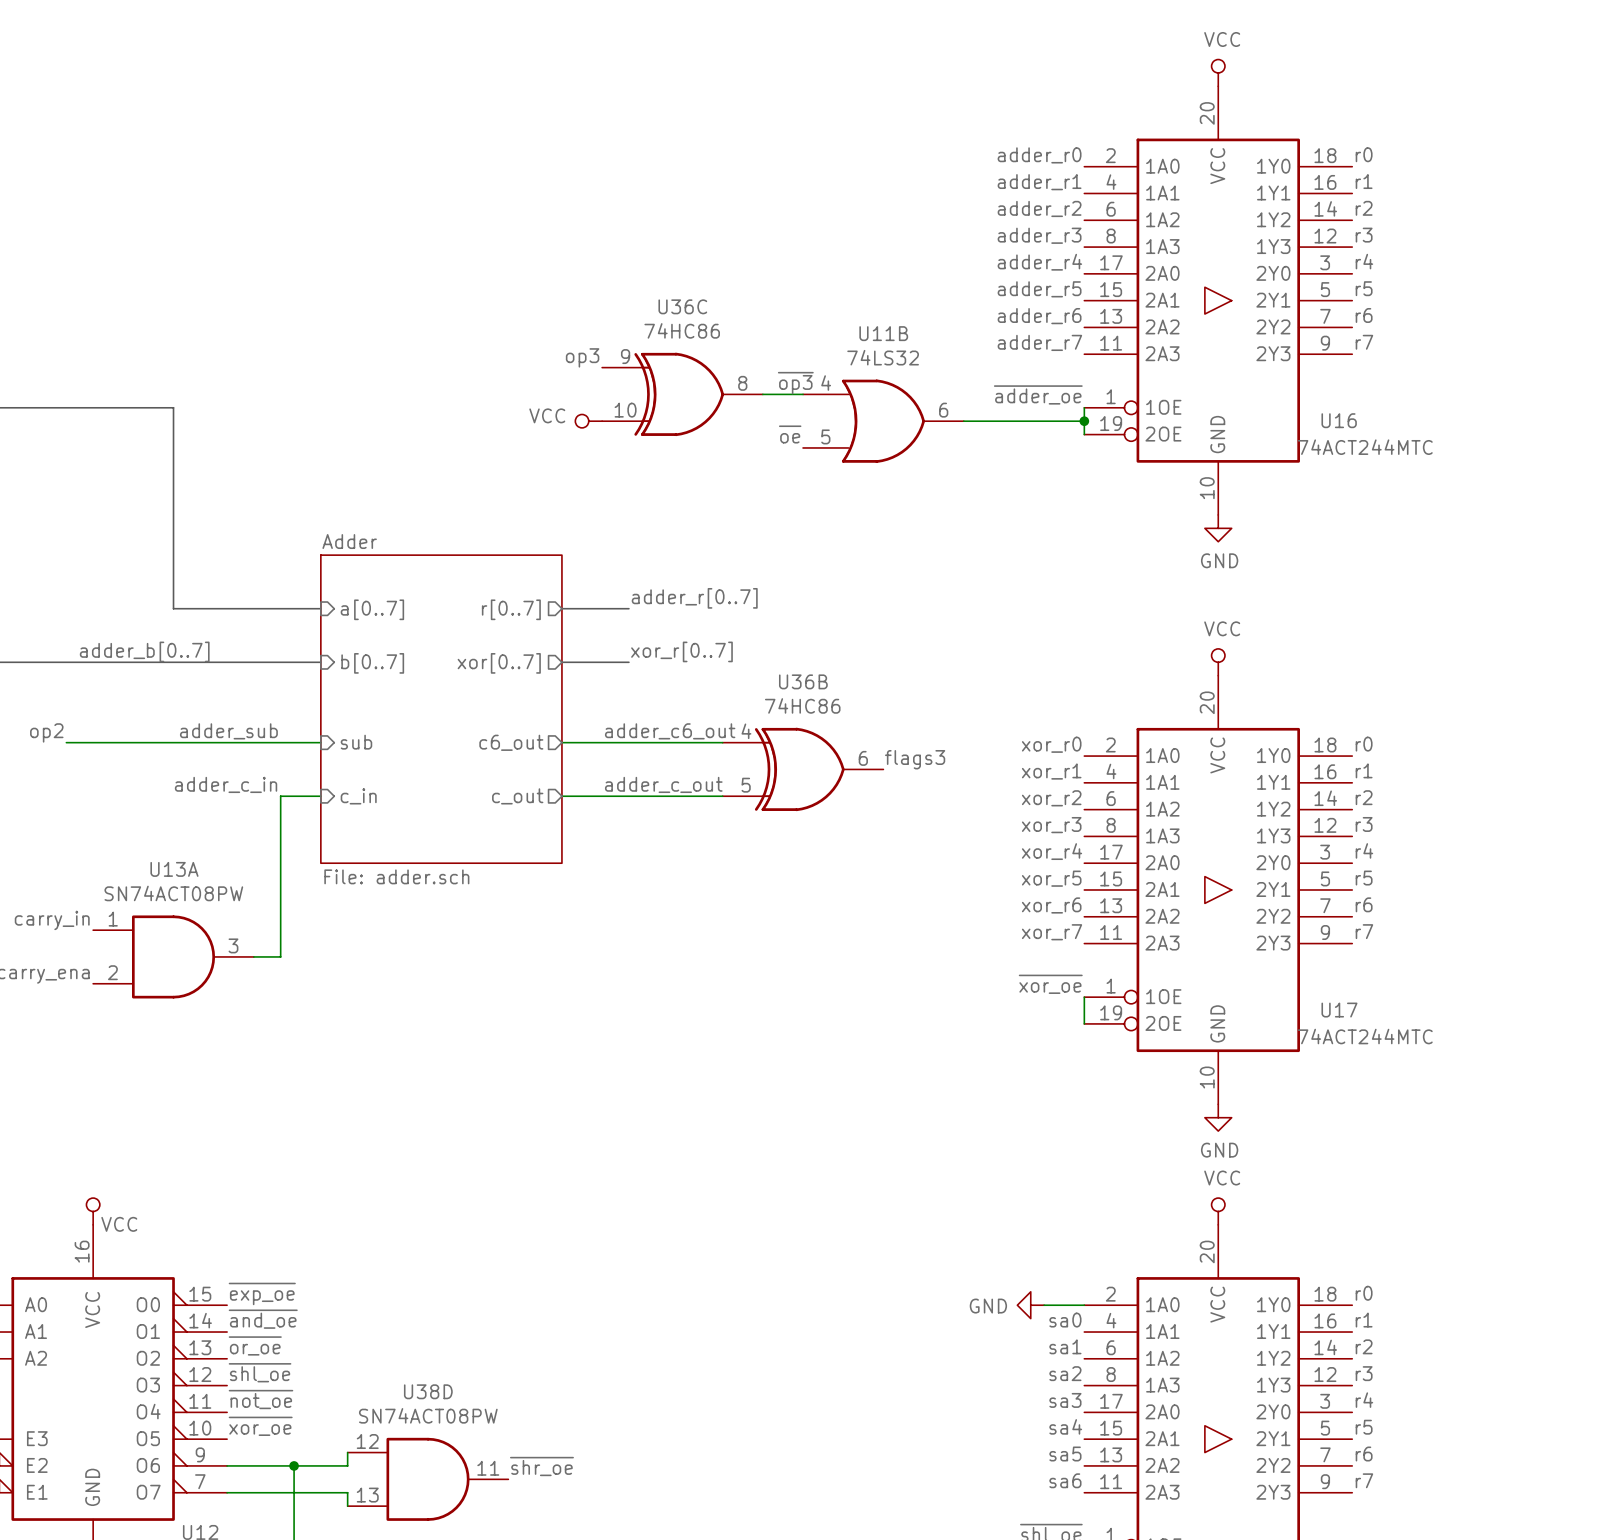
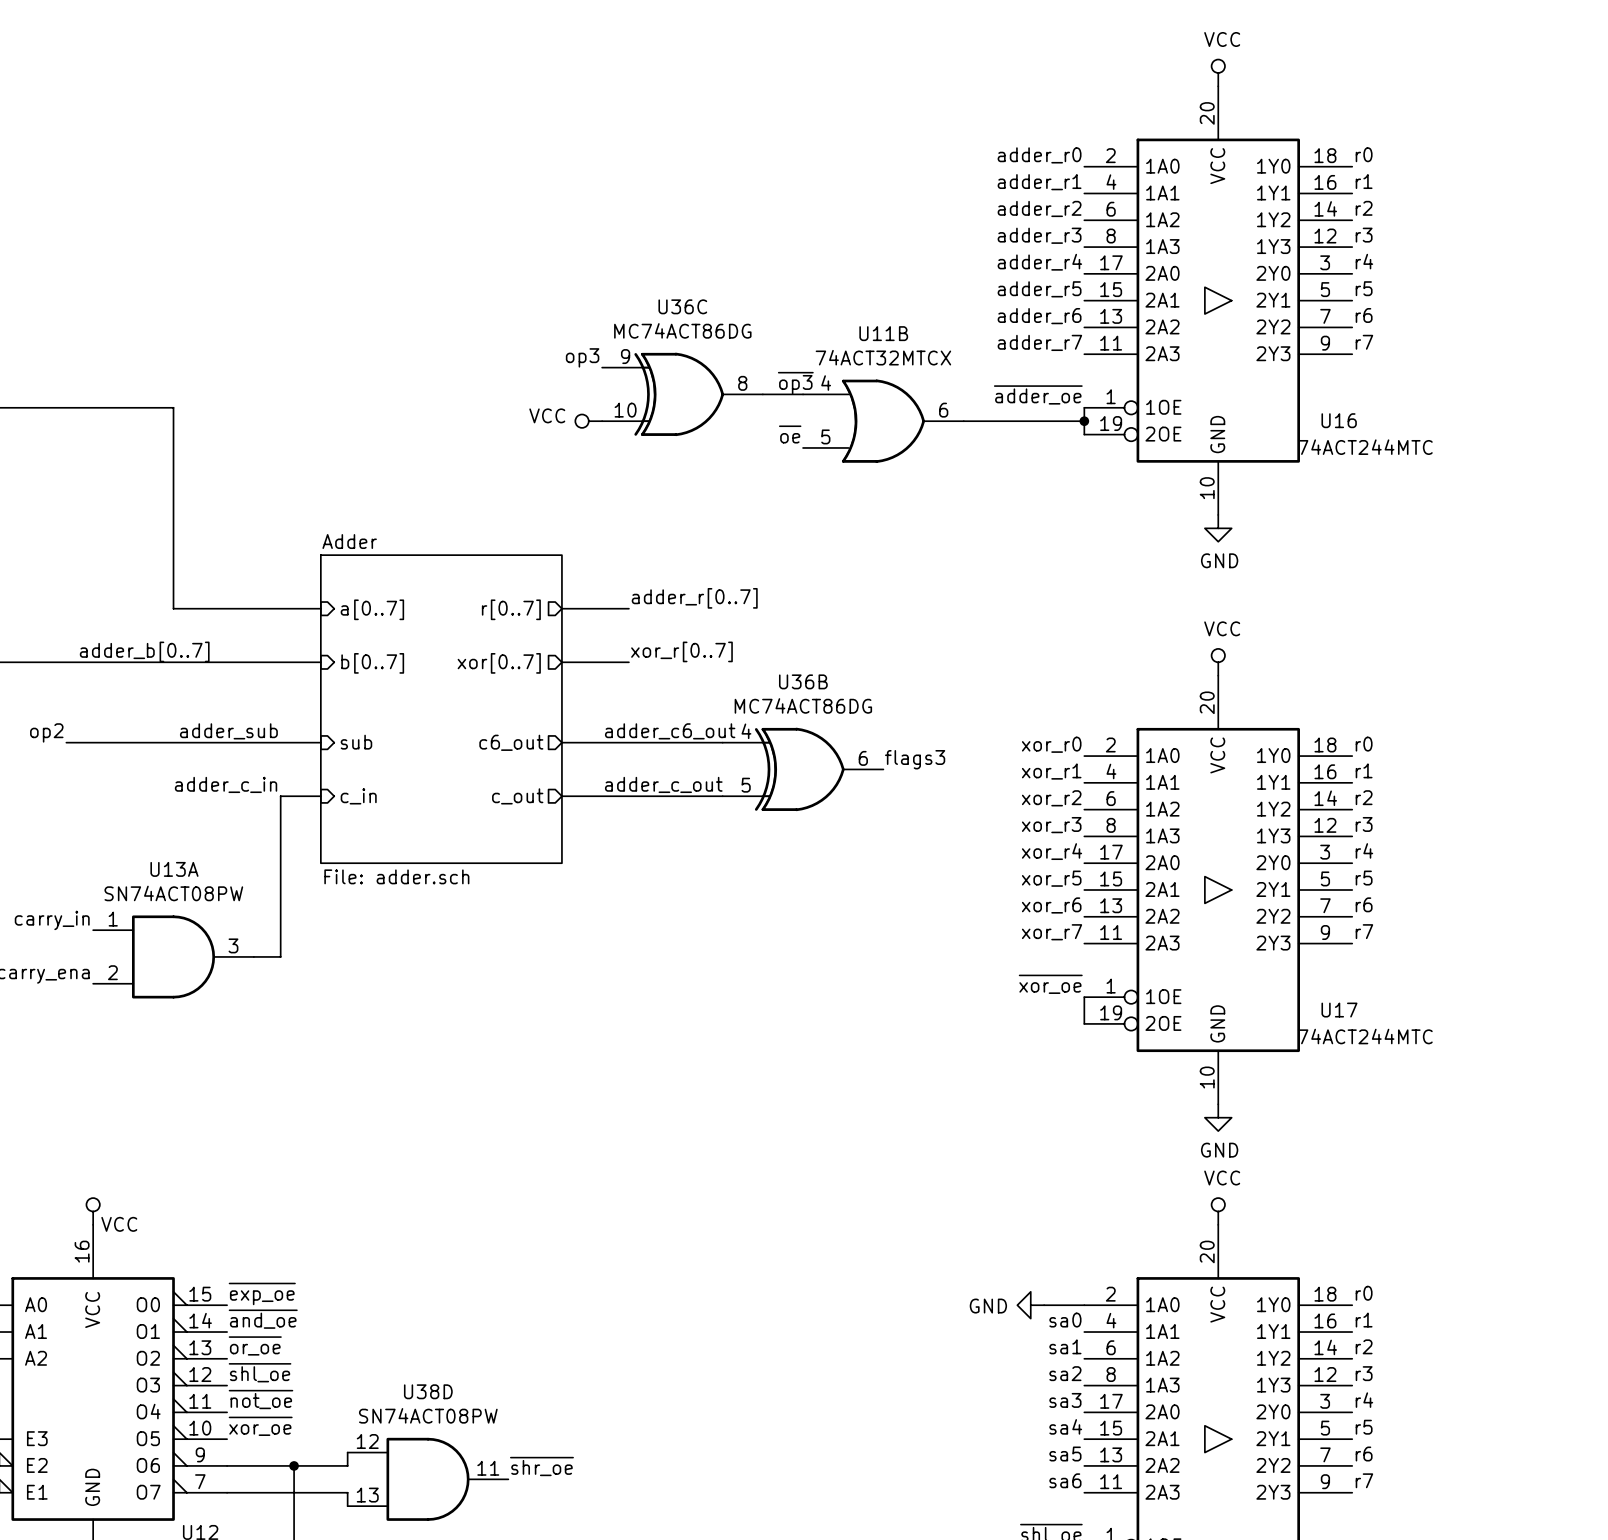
U36C value: 74HC86 (682, 330) -> MC74ACT86DG (682, 330)
U11B value: 74LS32 (883, 357) -> 74ACT32MTCX (883, 357)
U36B value: 74HC86 (802, 705) -> MC74ACT86DG (803, 705)

